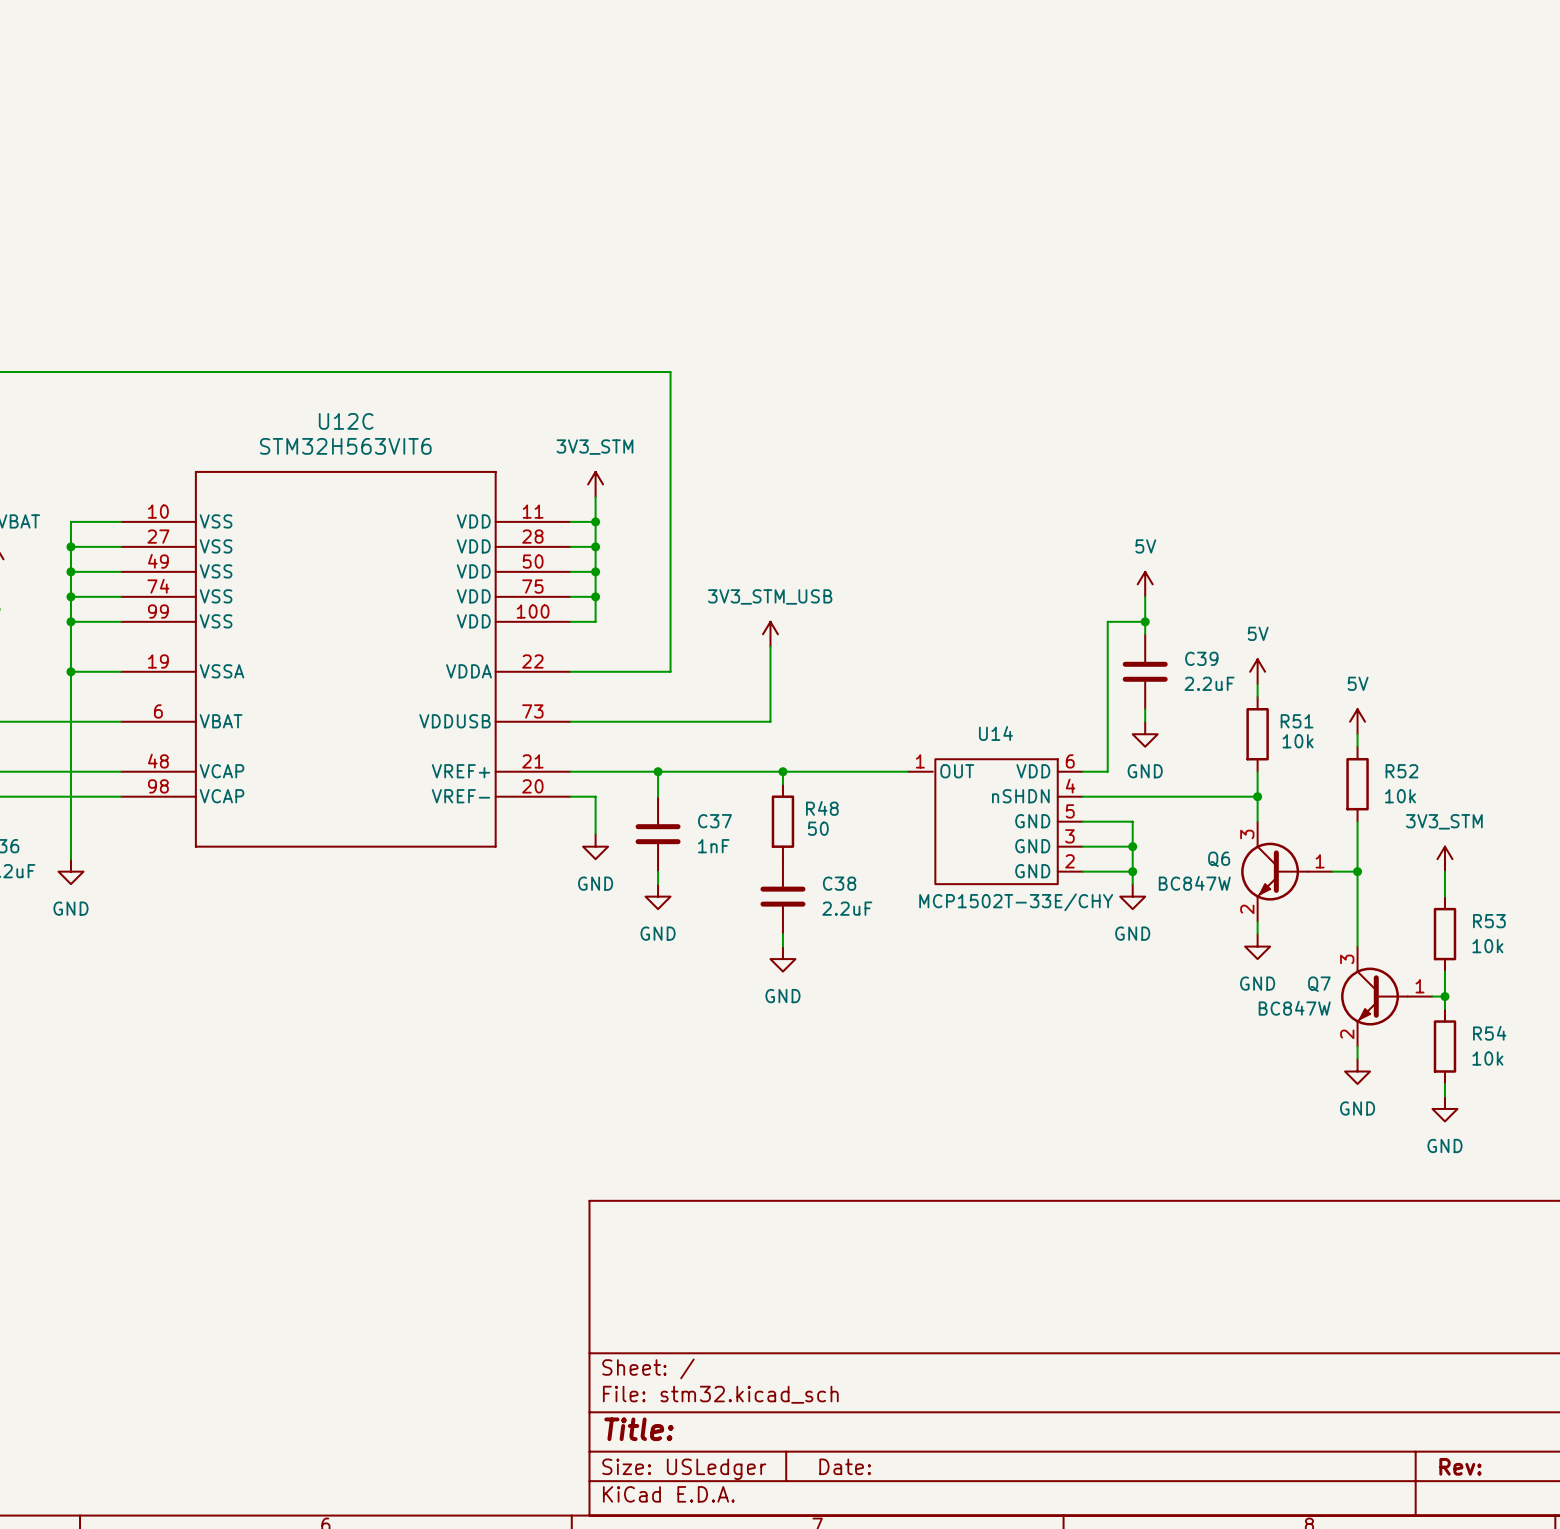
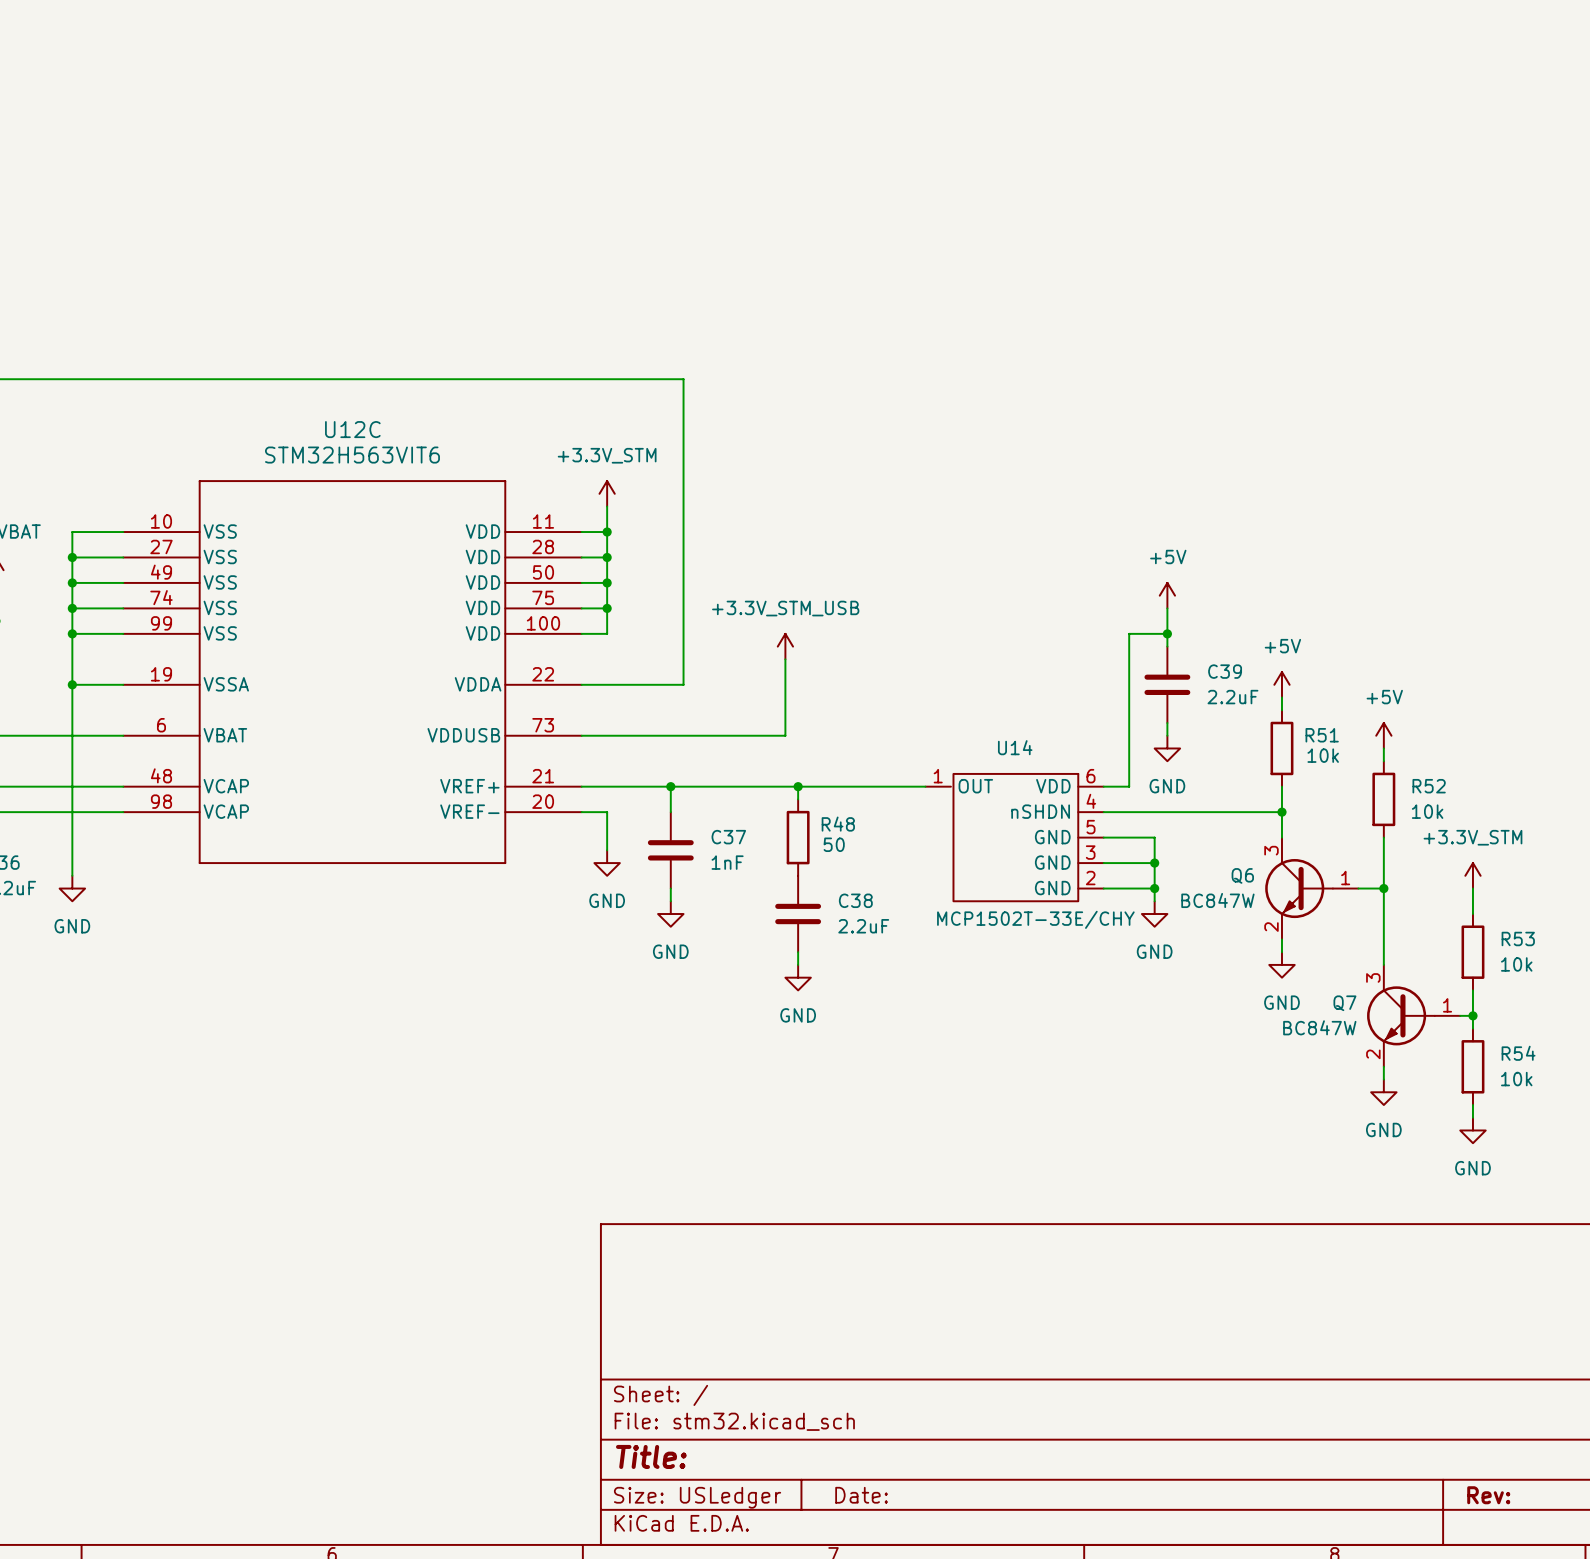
power symbol: 3V3_STM (595, 484) -> +3.3V_STM (607, 493)
power symbol: 5V (1145, 584) -> +5V (1167, 595)
power symbol: 3V3_STM_USB (770, 634) -> +3.3V_STM_USB (785, 646)
power symbol: 5V (1257, 671) -> +5V (1281, 684)
power symbol: 5V (1357, 721) -> +5V (1383, 735)
power symbol: 3V3_STM (1444, 859) -> +3.3V_STM (1472, 875)

